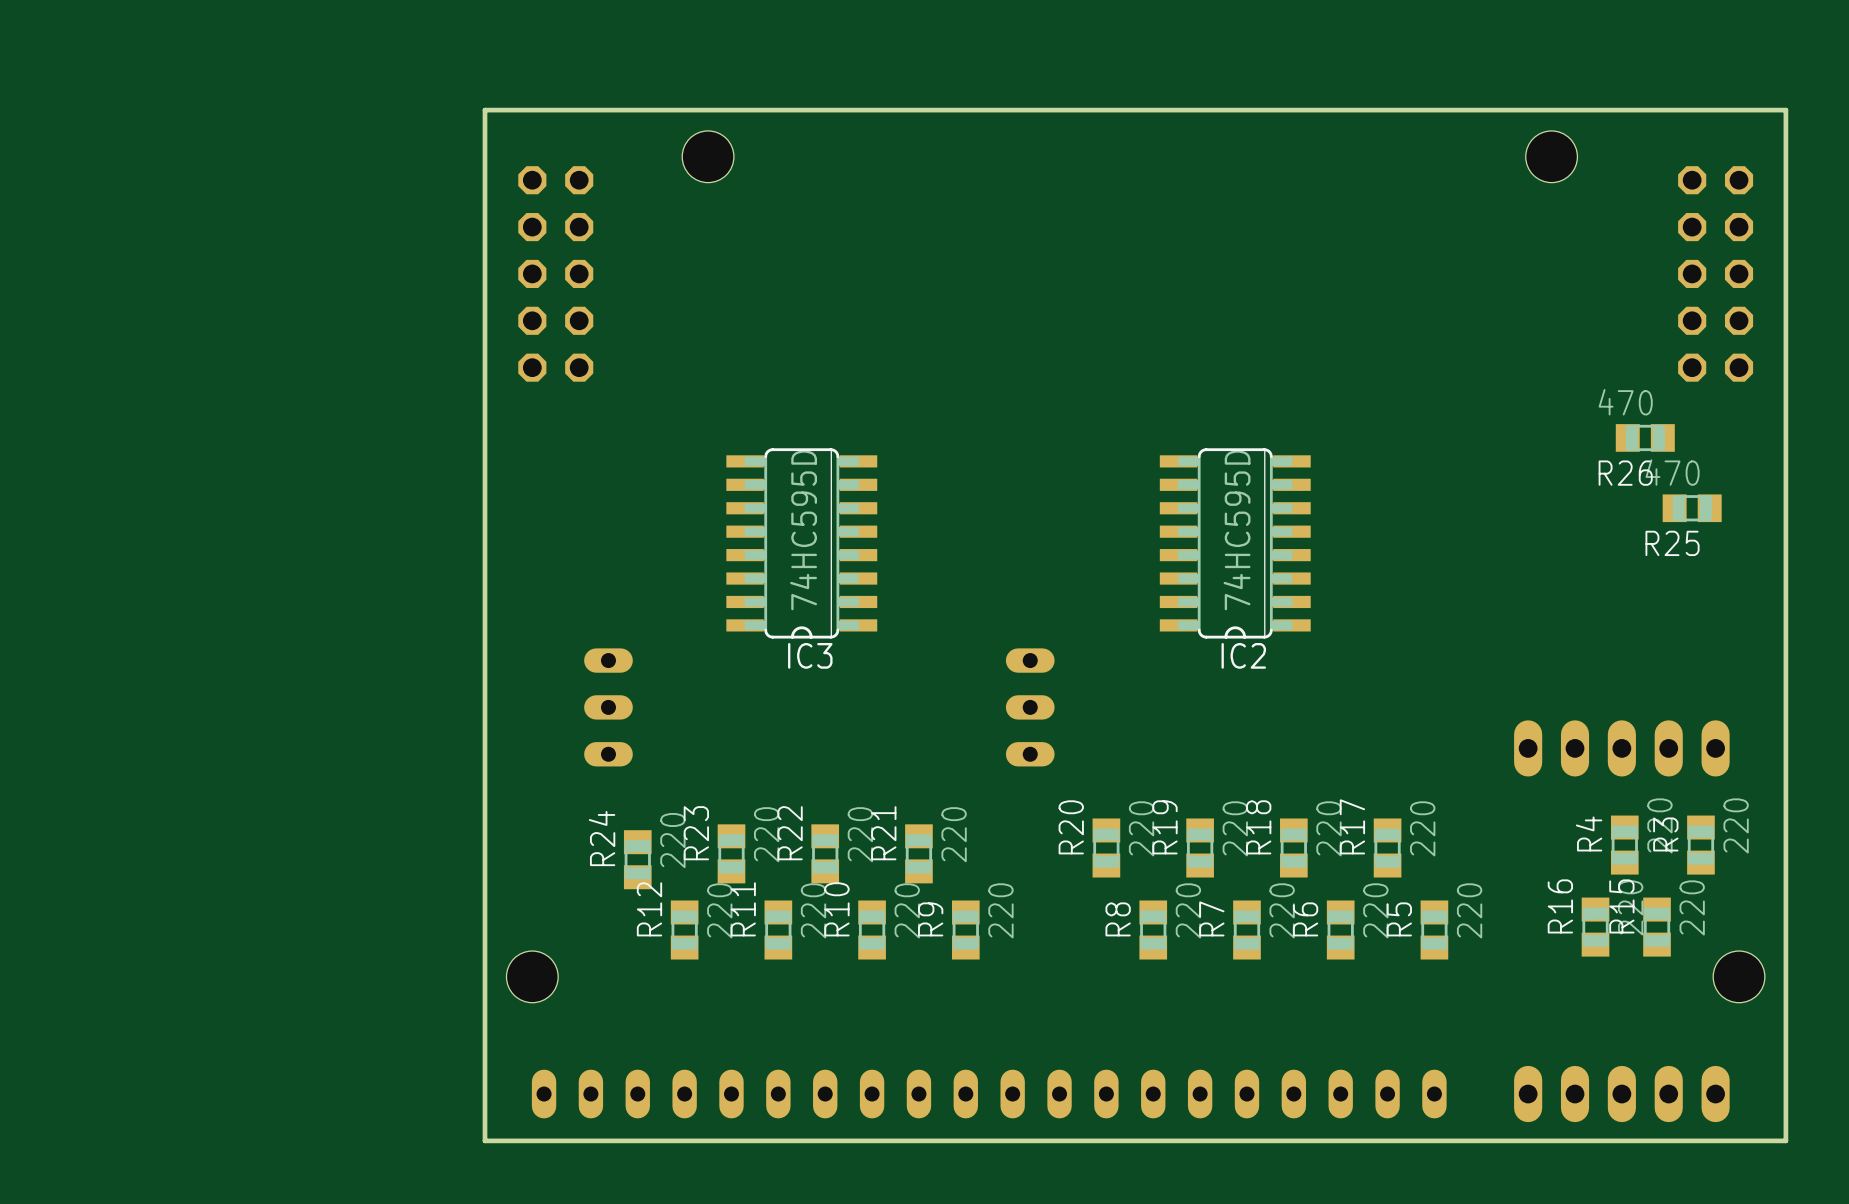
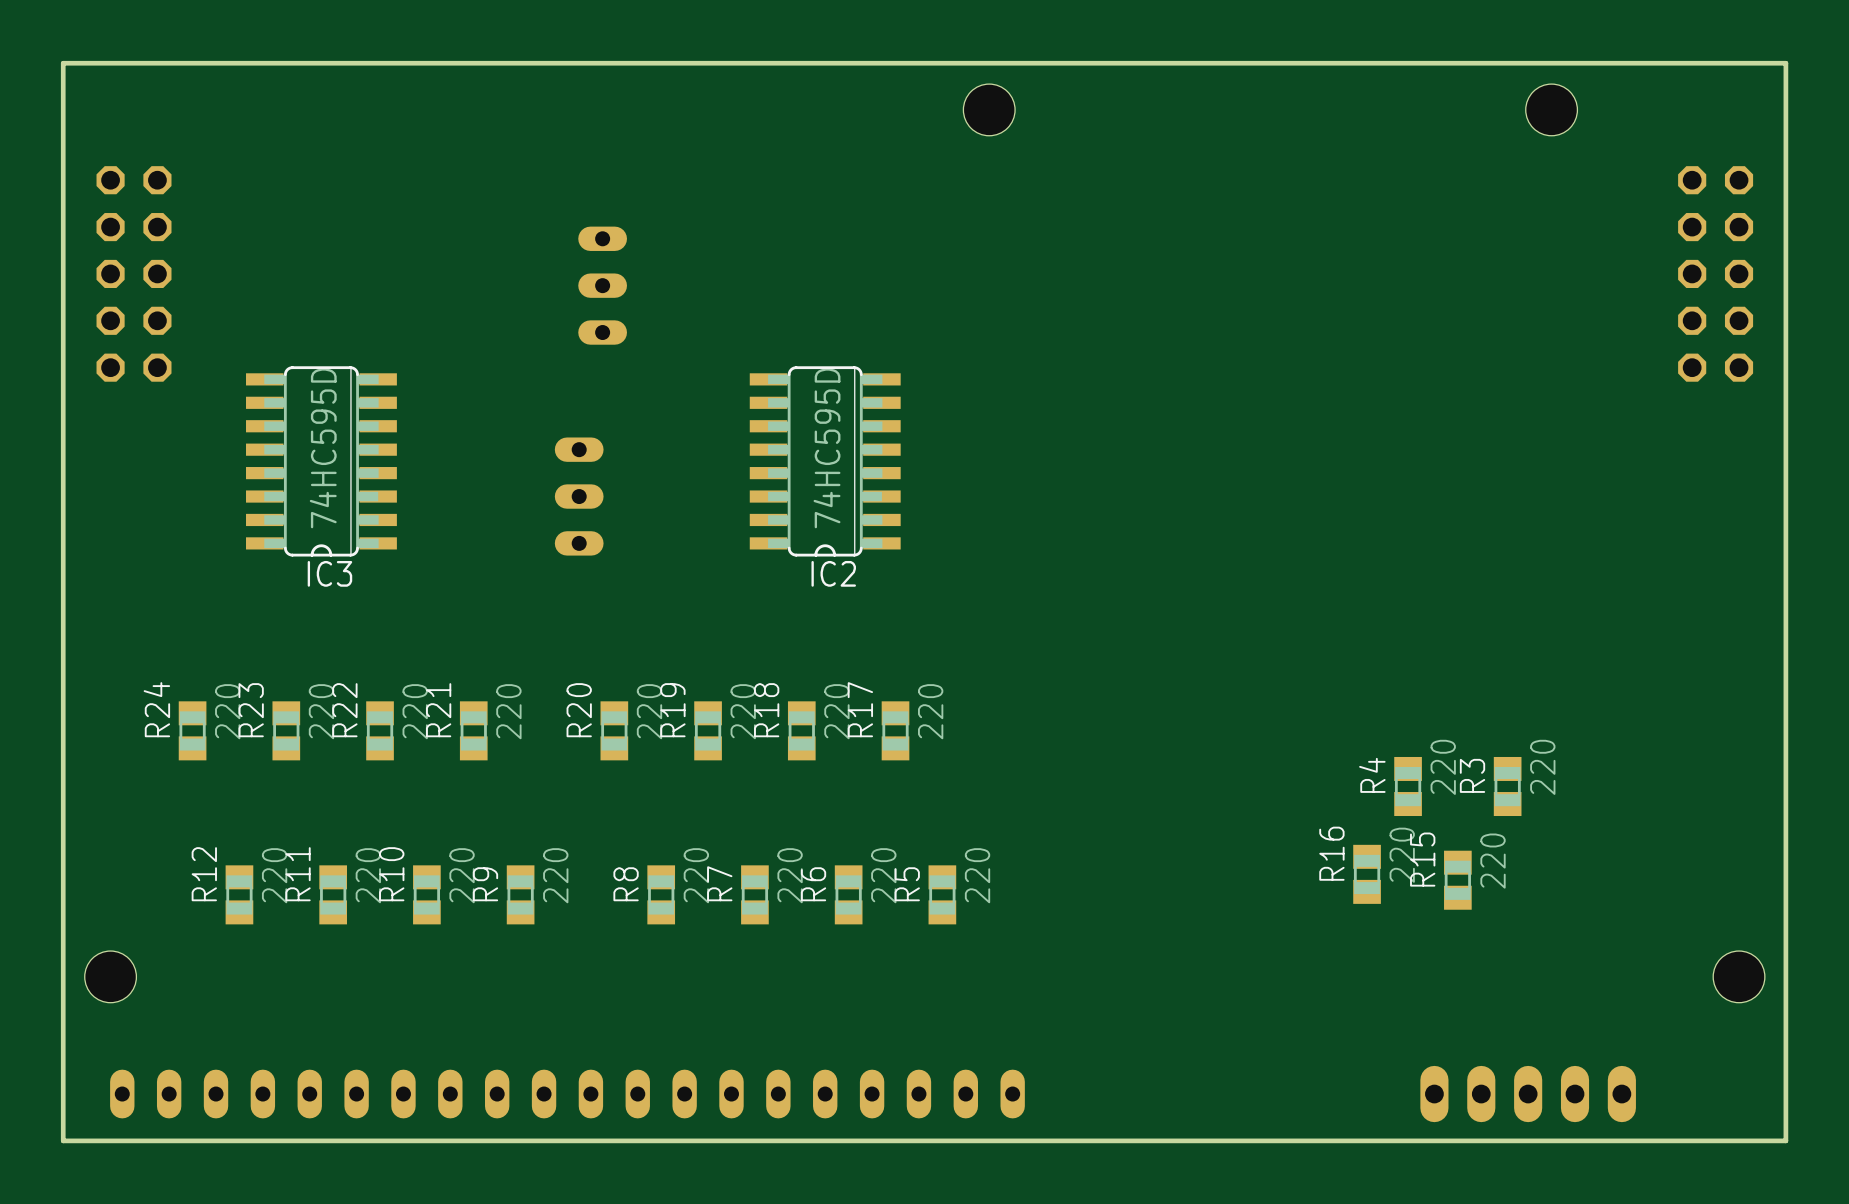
hole: none -> (989, 109)
board edge: (1785, 110) (485, 110) (485, 1140) -> (1785, 110) (1785, 63) (63, 63) (63, 1140) (485, 1140)
hole: (708, 156) -> none
hole position: (1551, 156) -> (1551, 109)
part position: (555, 273) -> (134, 273)
part: none -> (602, 285)
R26: 470 (1645, 437) -> none
part: none -> (579, 496)
R25: 470 (1692, 508) -> none
IC3 position: (801, 543) -> (321, 461)
IC2 position: (1235, 543) -> (825, 461)
part: (608, 707) -> none
part: (1030, 707) -> none
part: (1621, 748) -> none
R4 position: (1624, 845) -> (1408, 786)
R3 position: (1700, 845) -> (1507, 786)
R20 position: (1106, 848) -> (614, 730)
R19 position: (1200, 848) -> (708, 730)
R18 position: (1293, 848) -> (801, 730)
R17 position: (1387, 848) -> (895, 730)
R23 position: (731, 853) -> (286, 730)
R22 position: (825, 853) -> (380, 730)
R21 position: (918, 853) -> (473, 730)
R24 position: (637, 859) -> (192, 730)
R16 position: (1595, 927) -> (1367, 874)
R15 position: (1657, 927) -> (1457, 880)
R12 position: (684, 930) -> (239, 894)
R11 position: (778, 930) -> (333, 894)
R10 position: (872, 930) -> (426, 894)
R9 position: (965, 930) -> (520, 894)
R8 position: (1153, 930) -> (661, 894)
R7 position: (1246, 930) -> (754, 894)
R6 position: (1340, 930) -> (848, 894)
R5 position: (1434, 930) -> (942, 894)
hole position: (532, 976) -> (110, 976)
part position: (989, 1094) -> (567, 1094)
part position: (1621, 1094) -> (1528, 1094)

